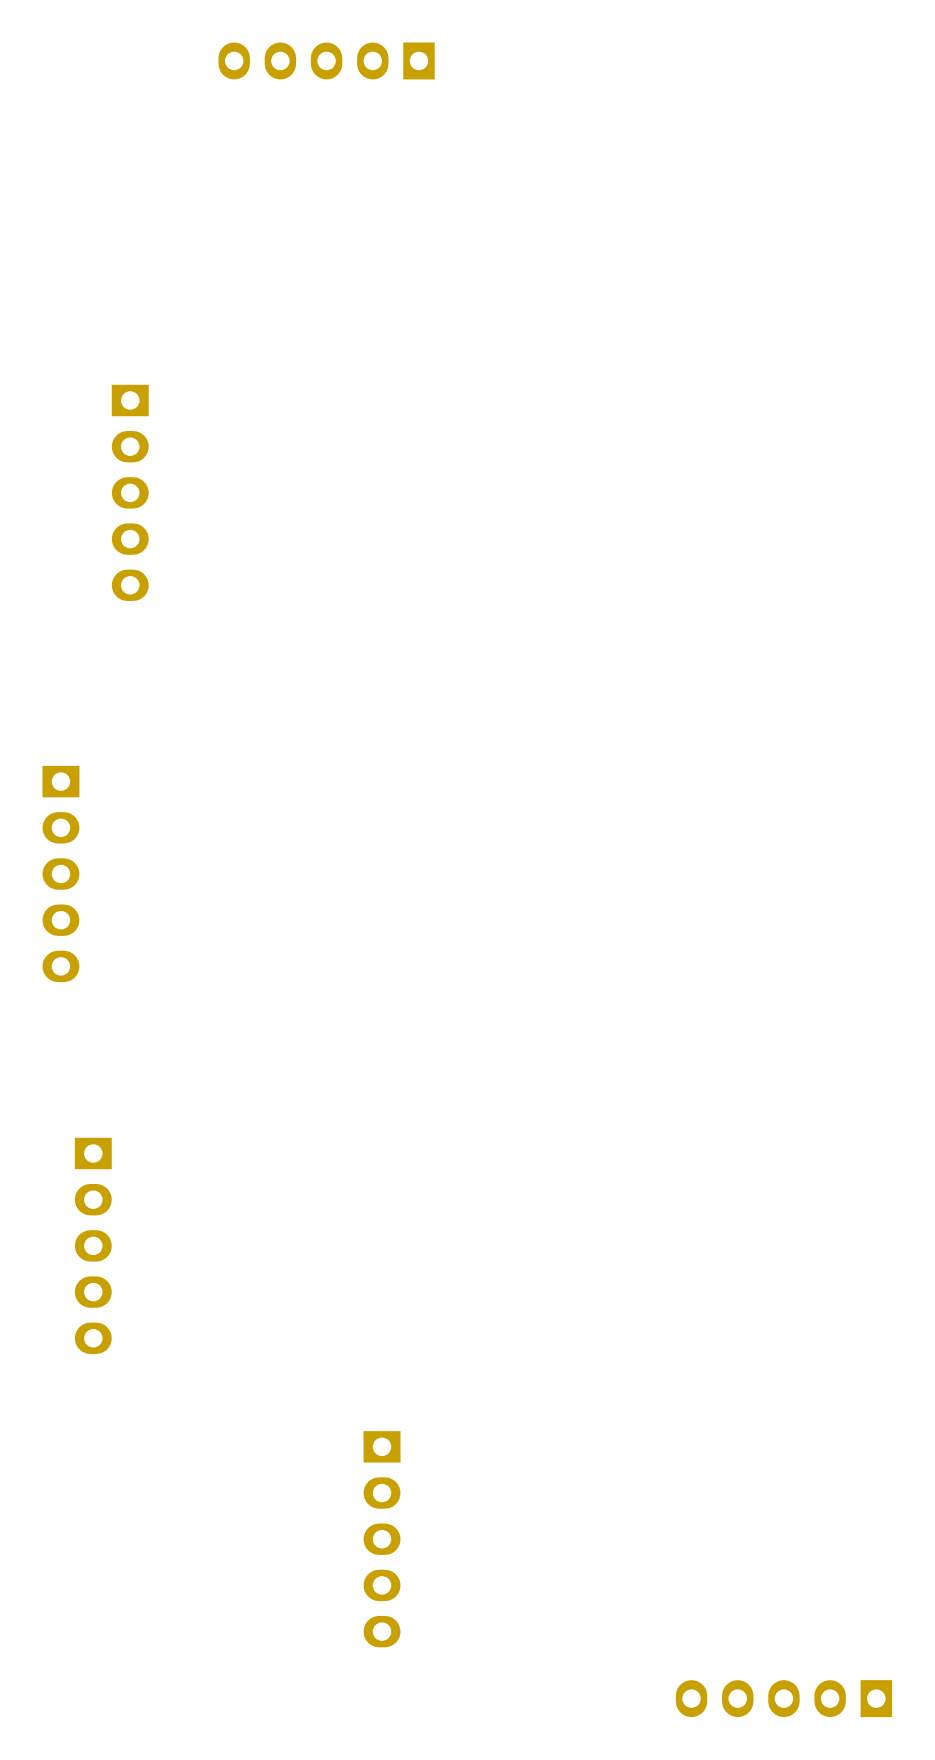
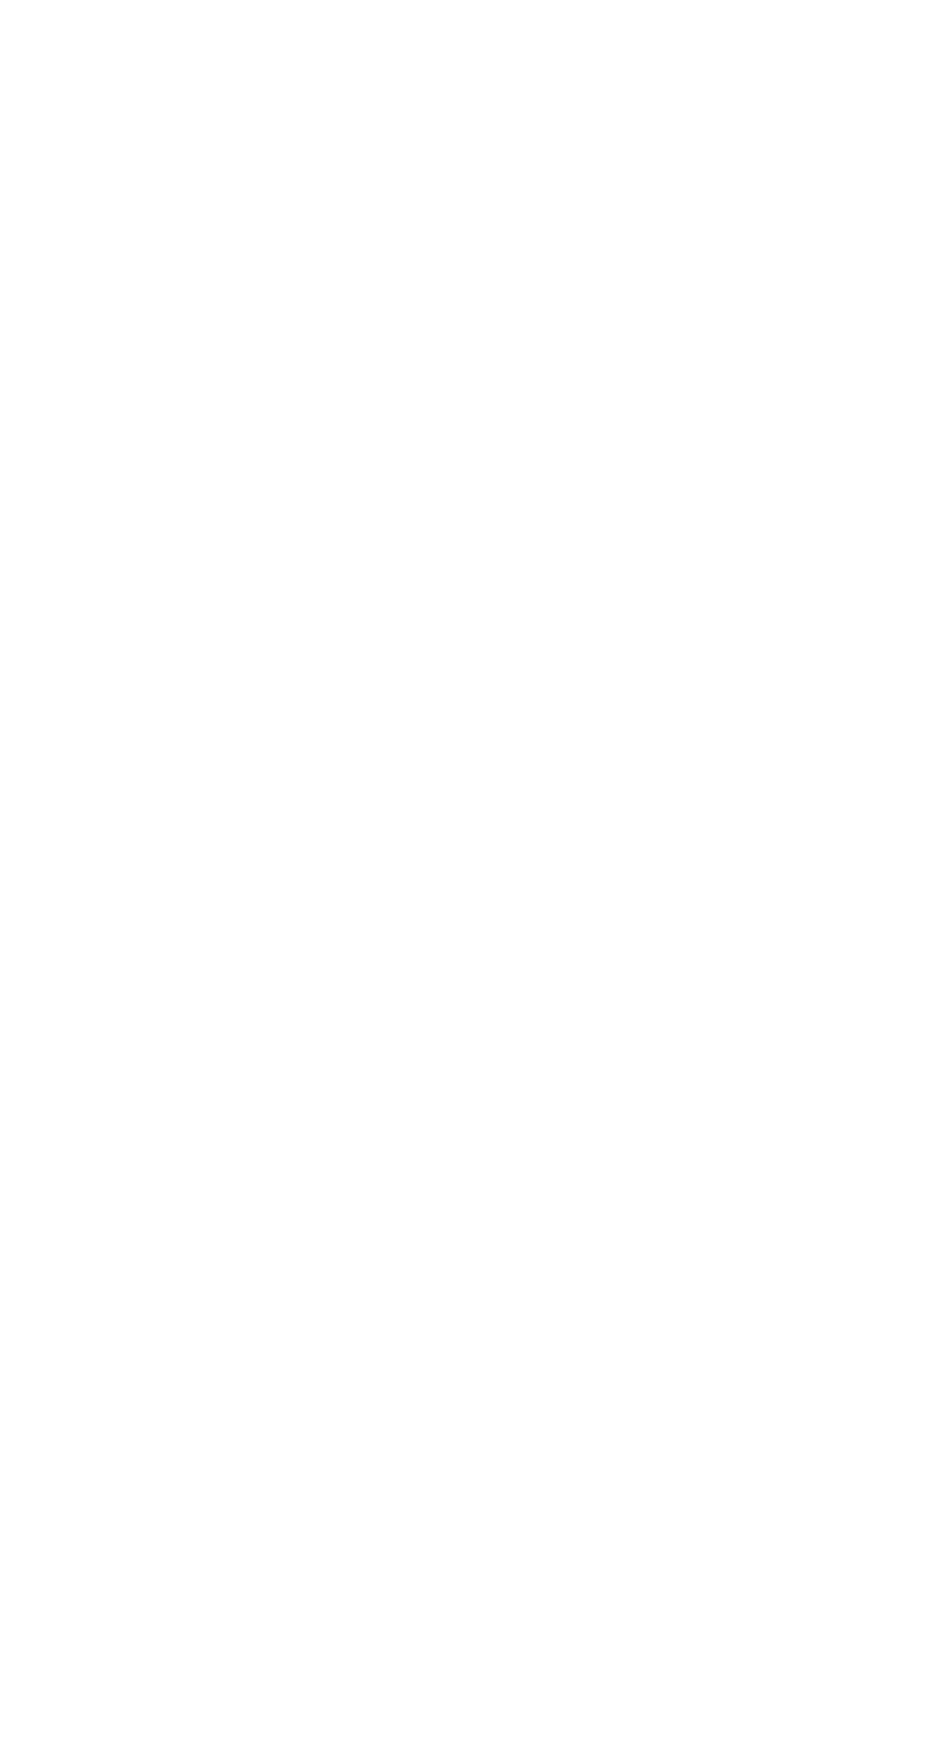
part: (326, 60) -> none
part: (130, 492) -> none
part: (60, 874) -> none
part: (93, 1245) -> none
part: (382, 1539) -> none
part: (783, 1698) -> none

